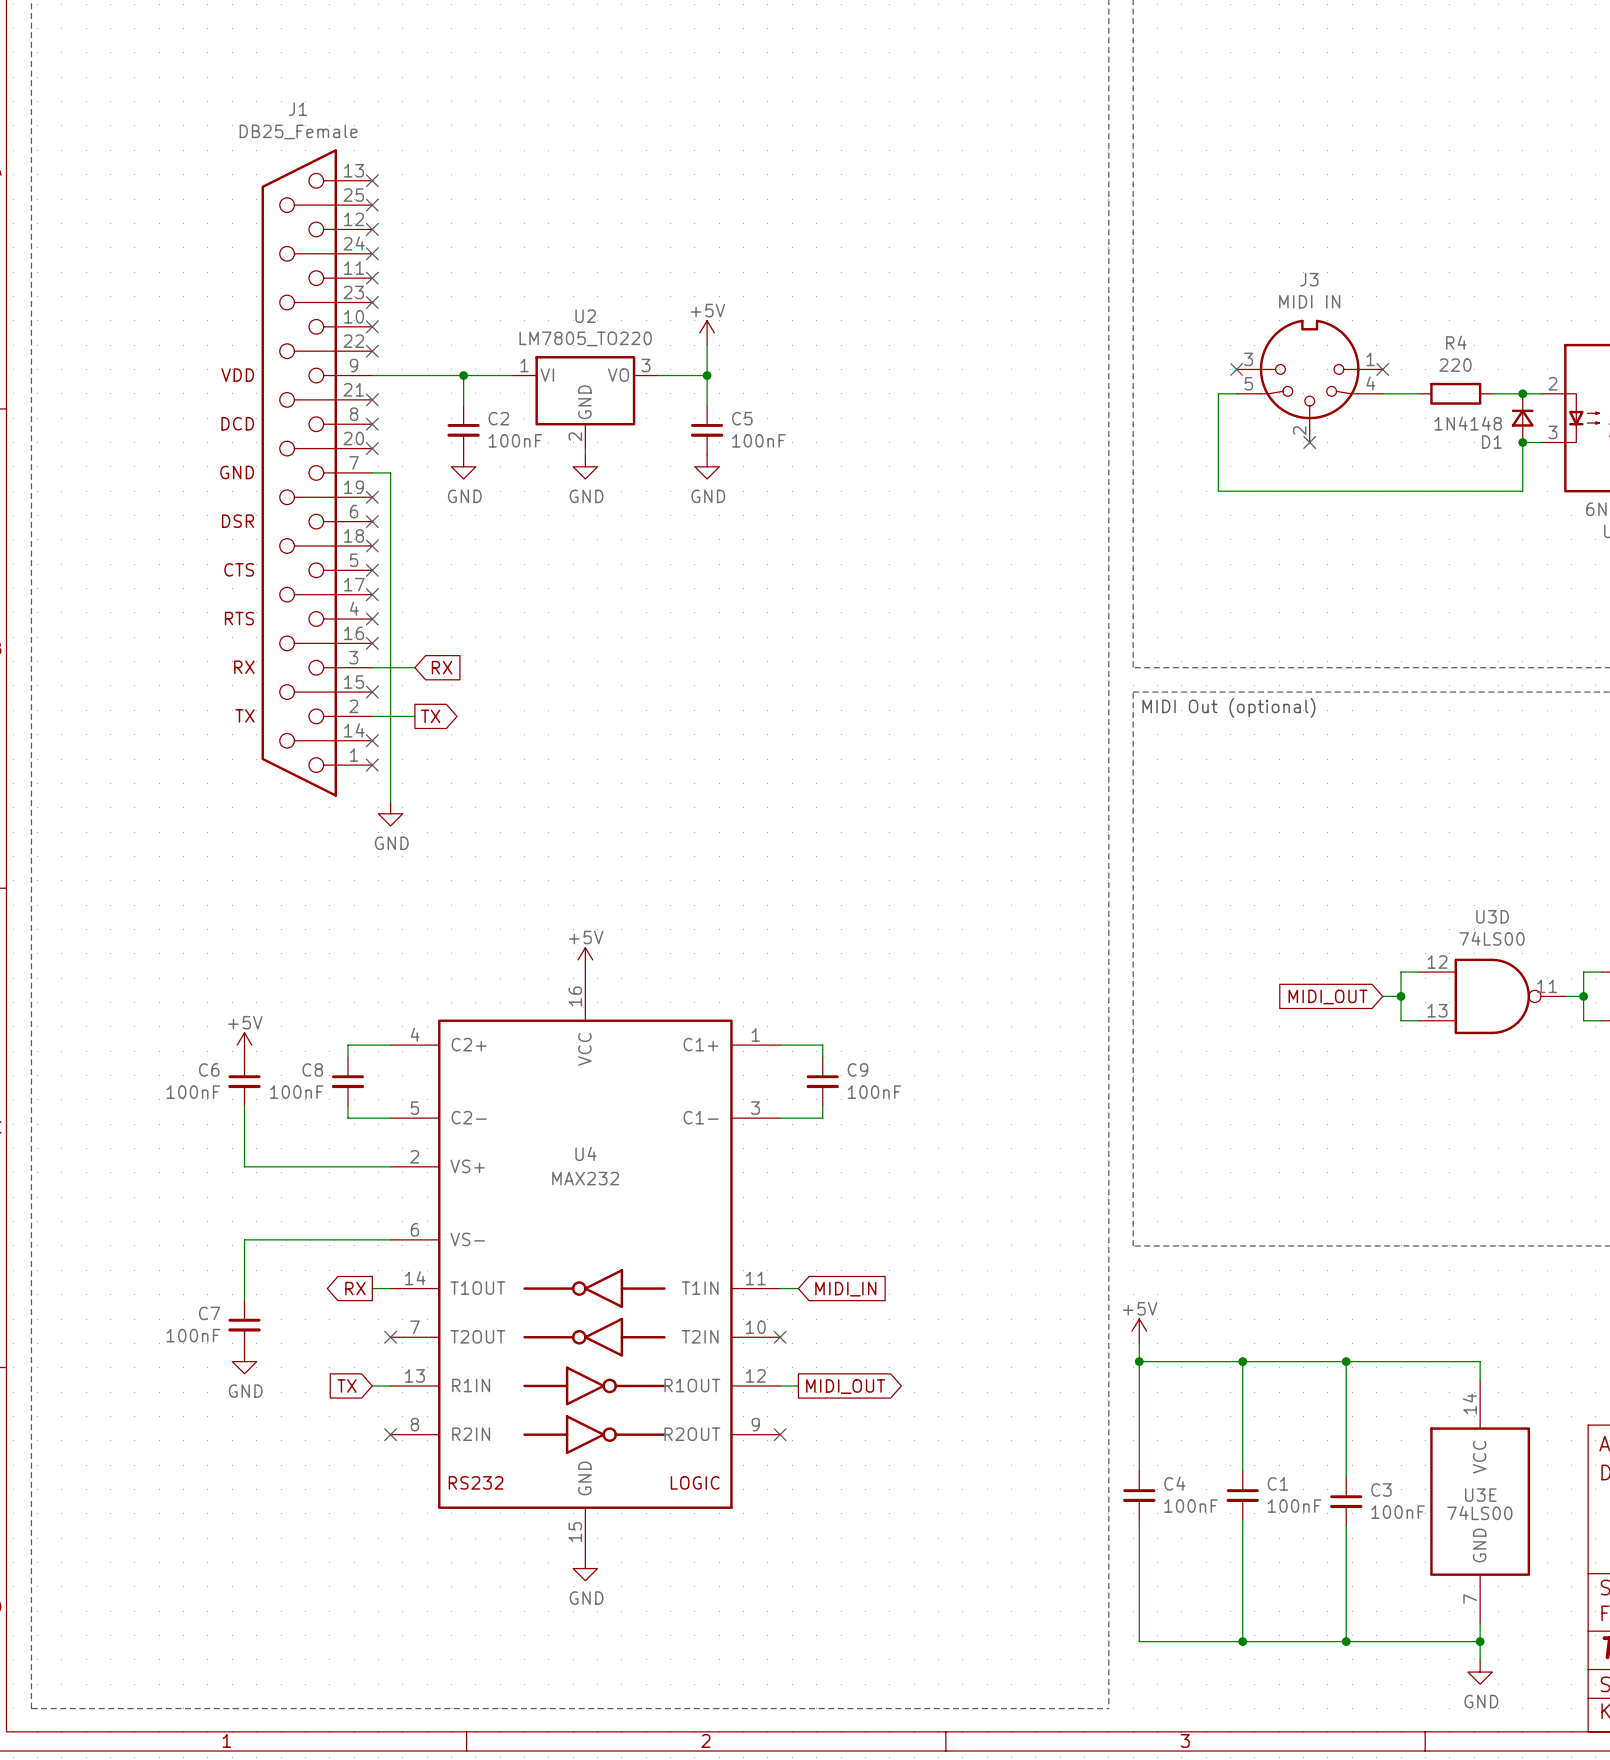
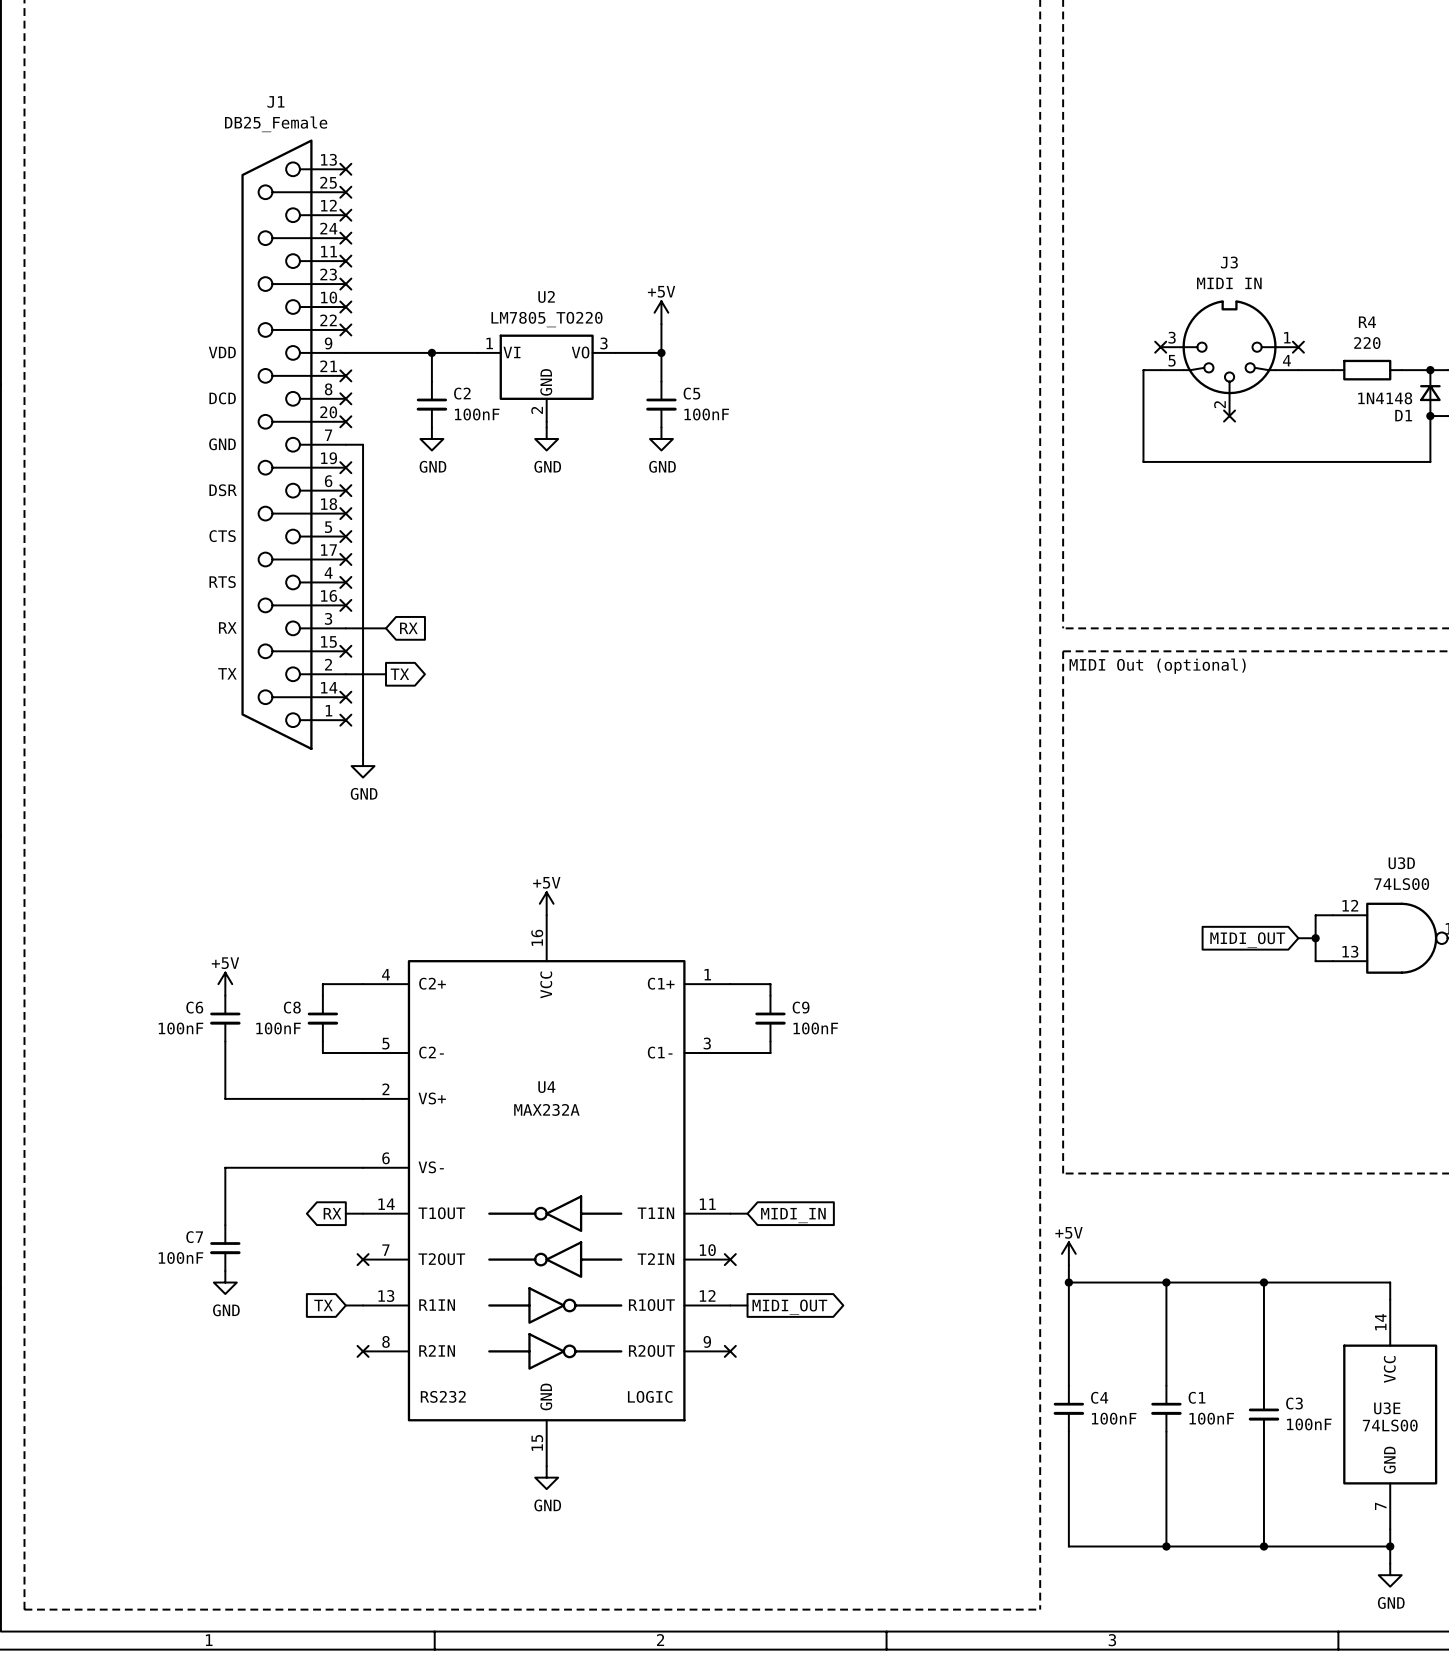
U4 value: MAX232 (585, 1178) -> MAX232A (546, 1109)

